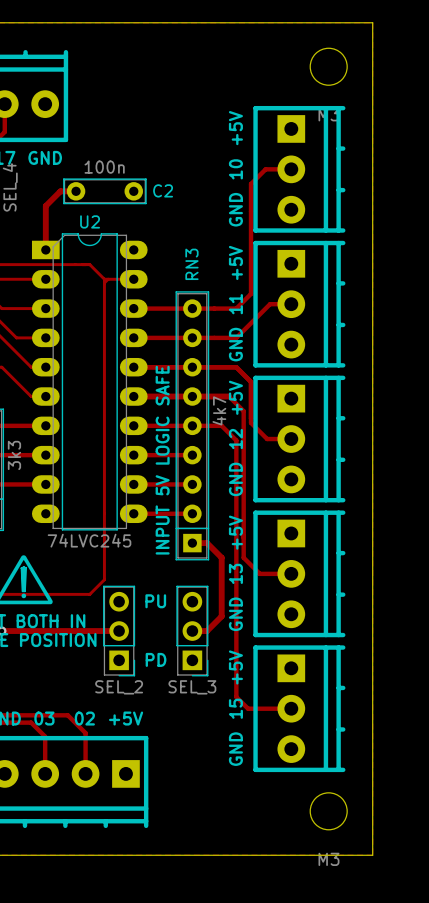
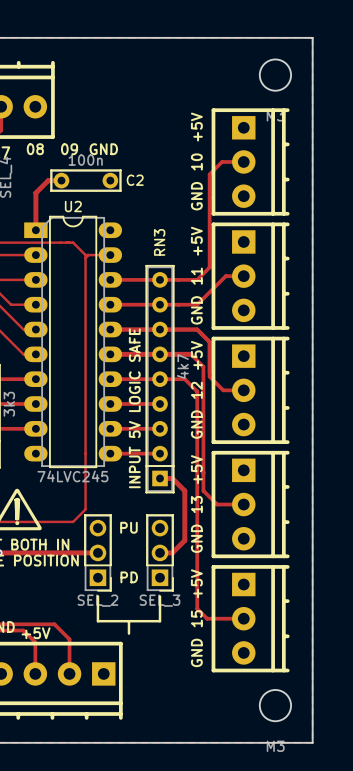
text: none -> 09 (69, 149)
text: none -> GND (103, 149)
text: GND (45, 157) -> 08 (35, 149)
line: none -> (97, 596) (97, 621) (160, 621) (160, 596)
line: none -> (128, 621) (128, 633)
text: 03 (44, 718) -> +5V (36, 633)
text: 02 (84, 718) -> none
text: +5V (126, 718) -> none

